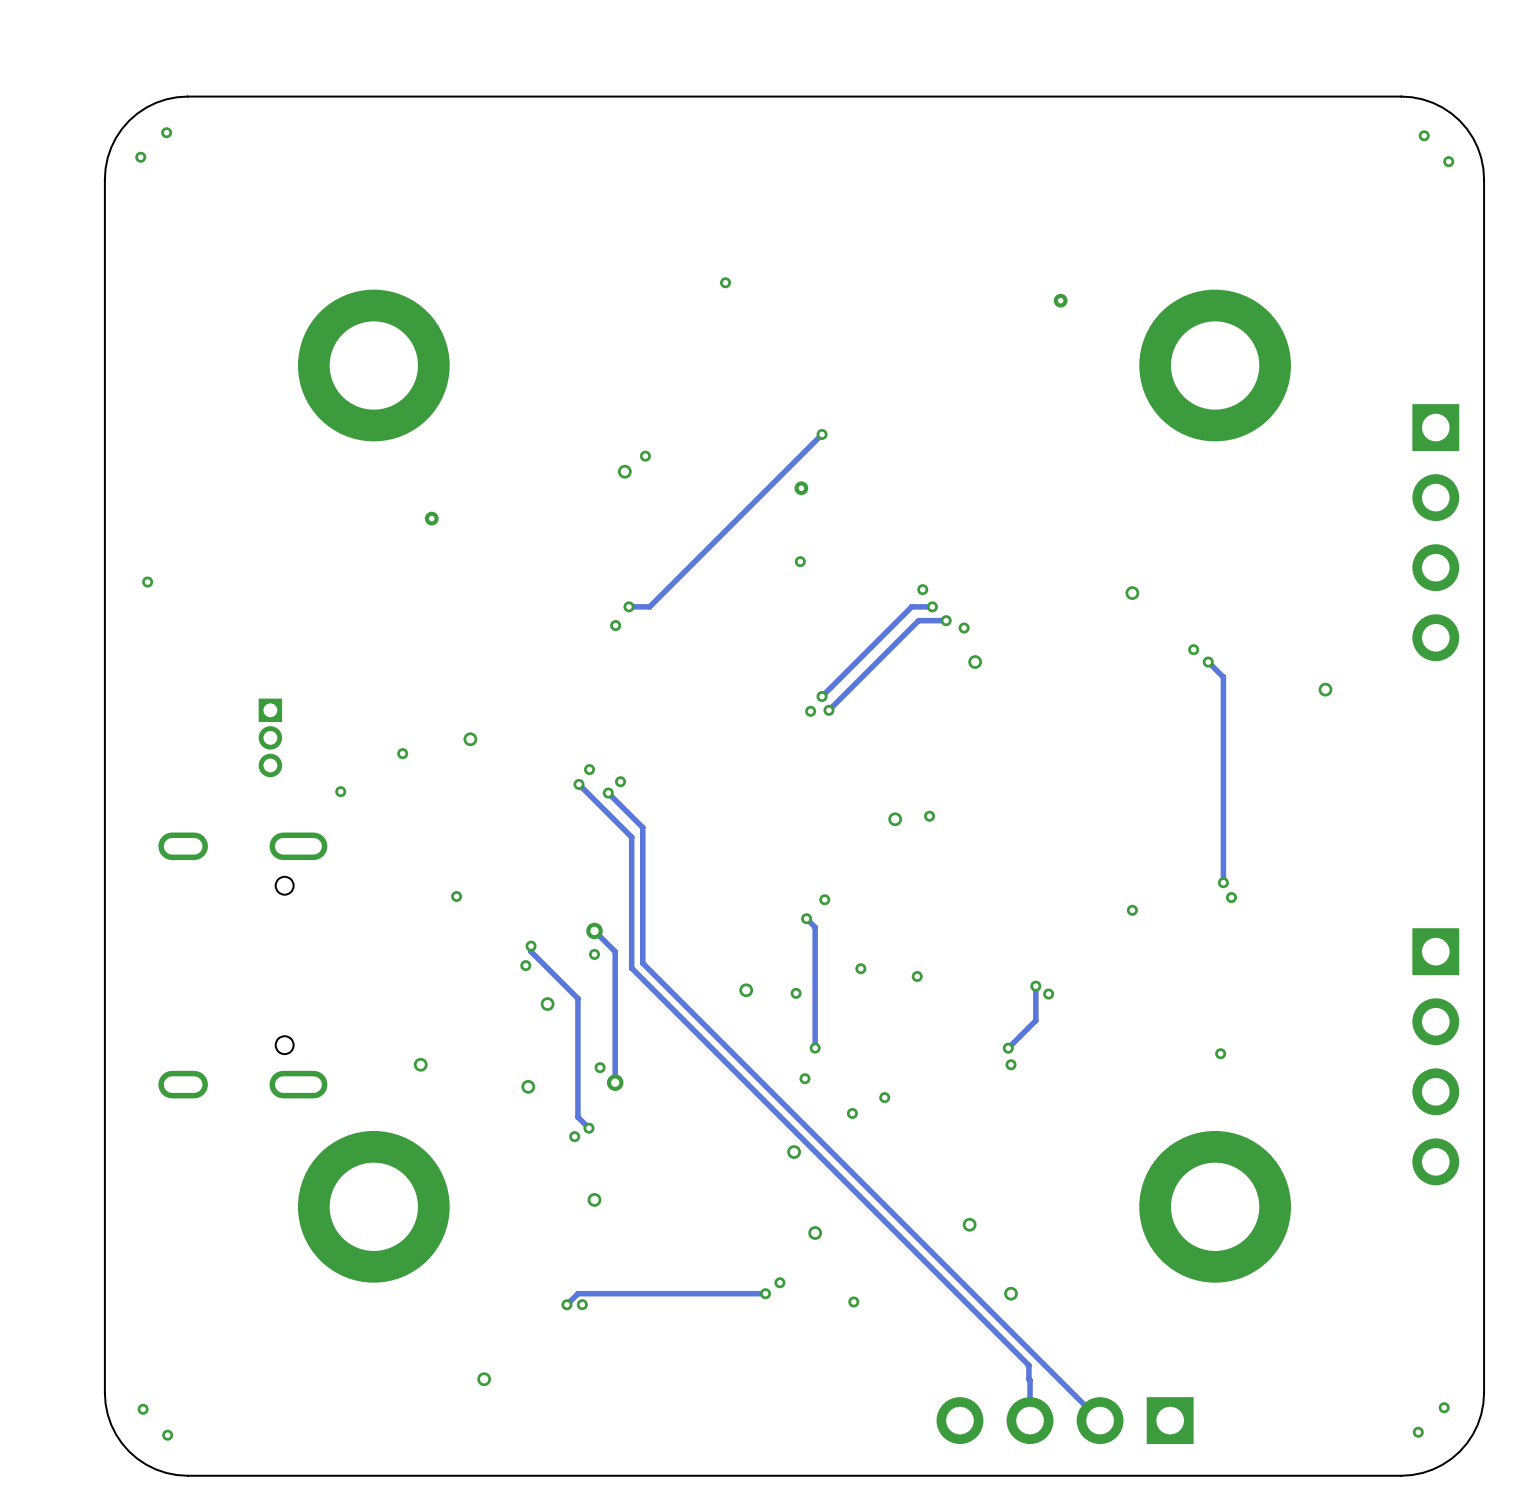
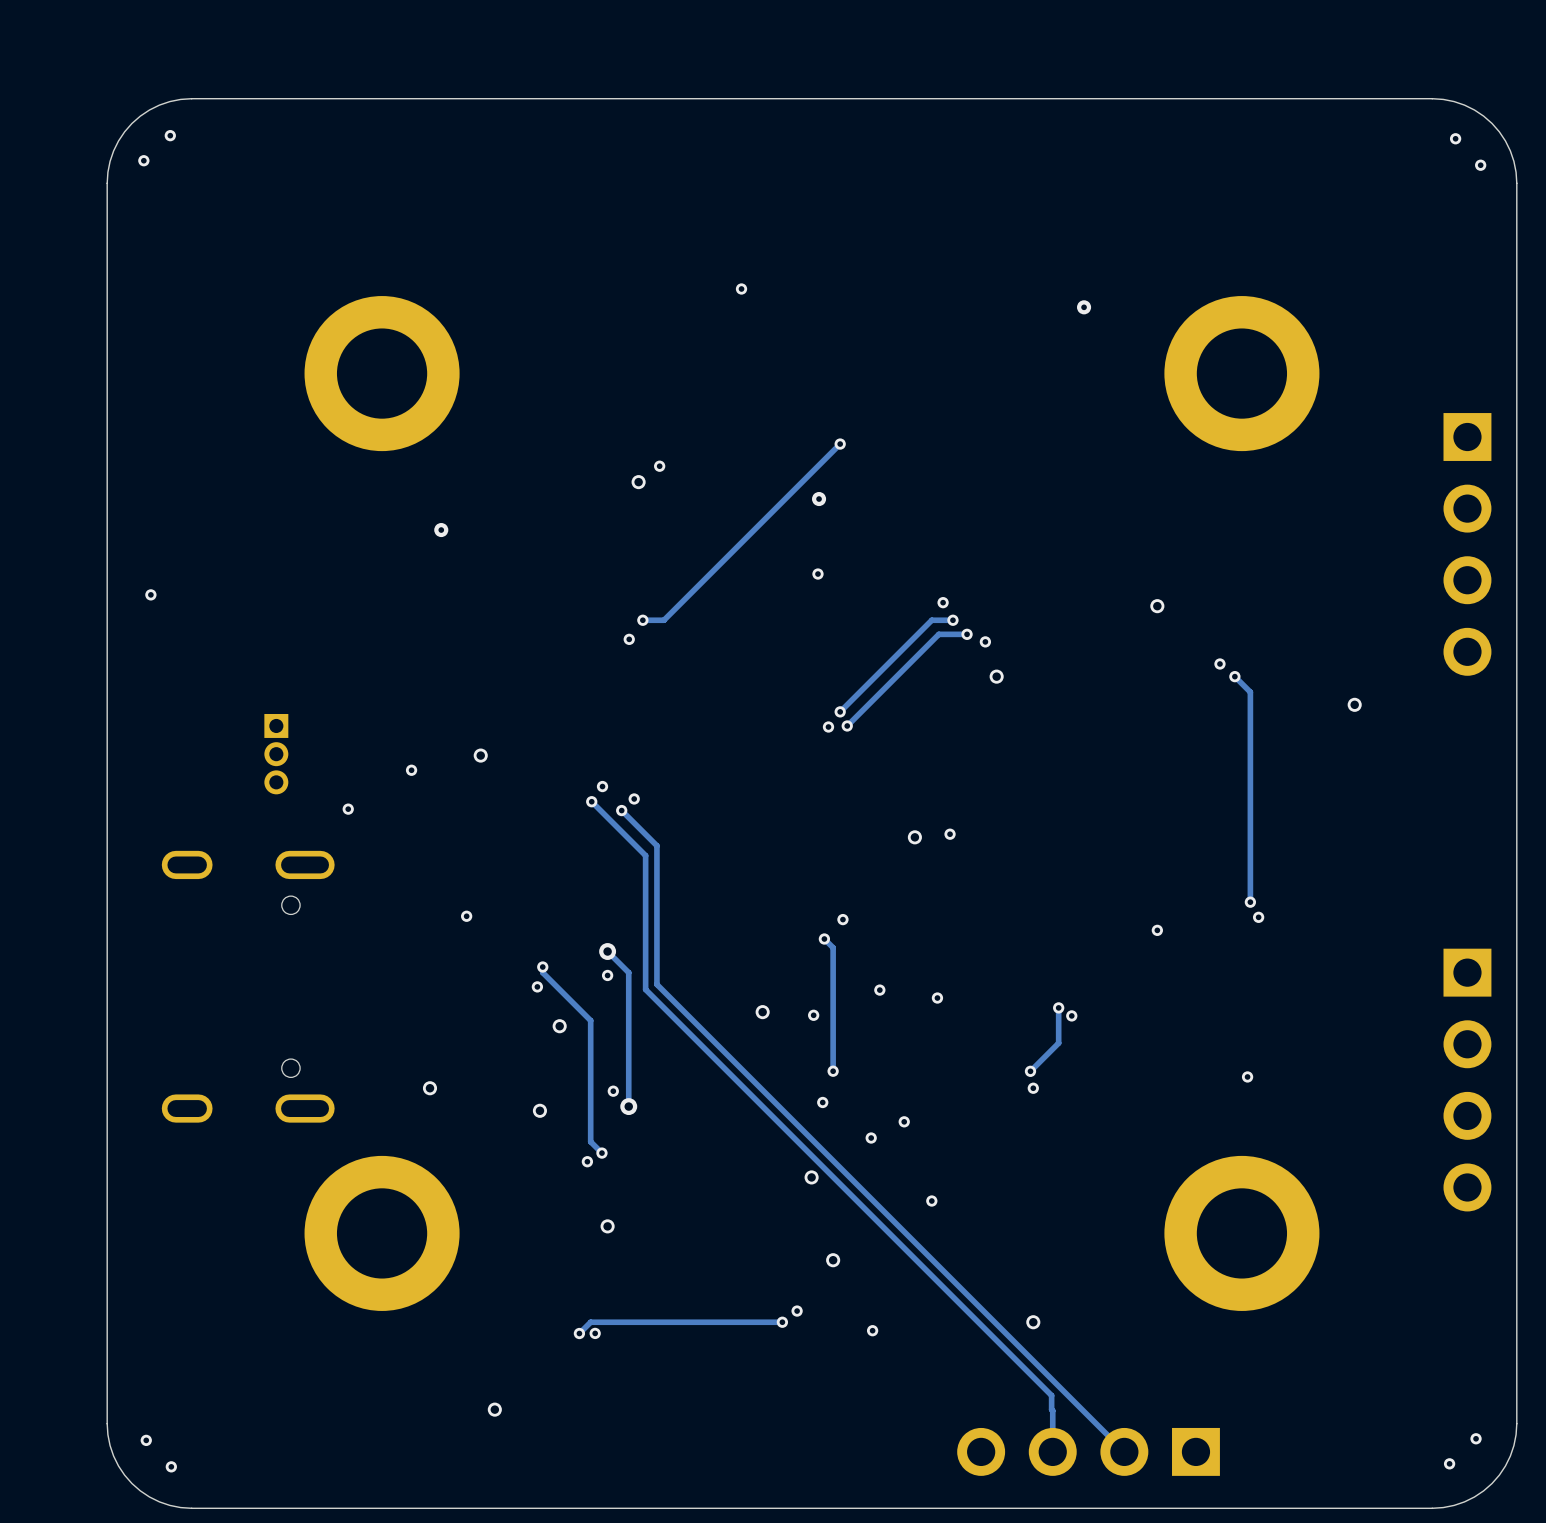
via: none -> (931, 1201)
via: (969, 1224) -> none

